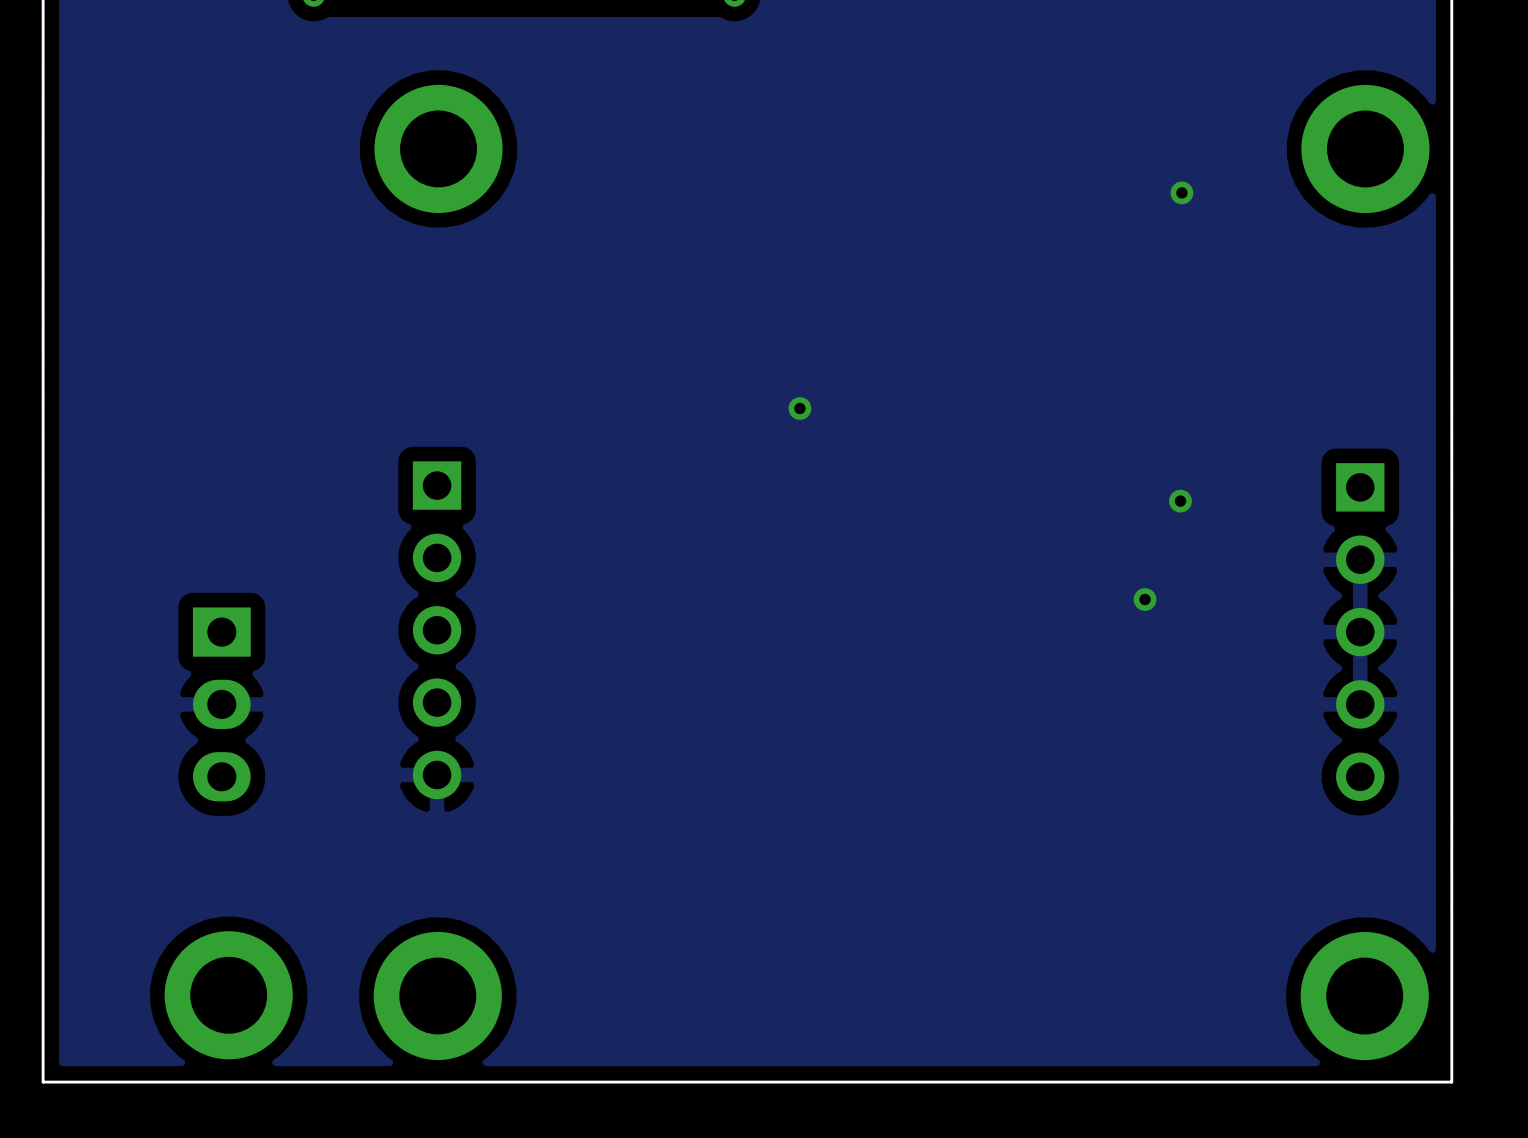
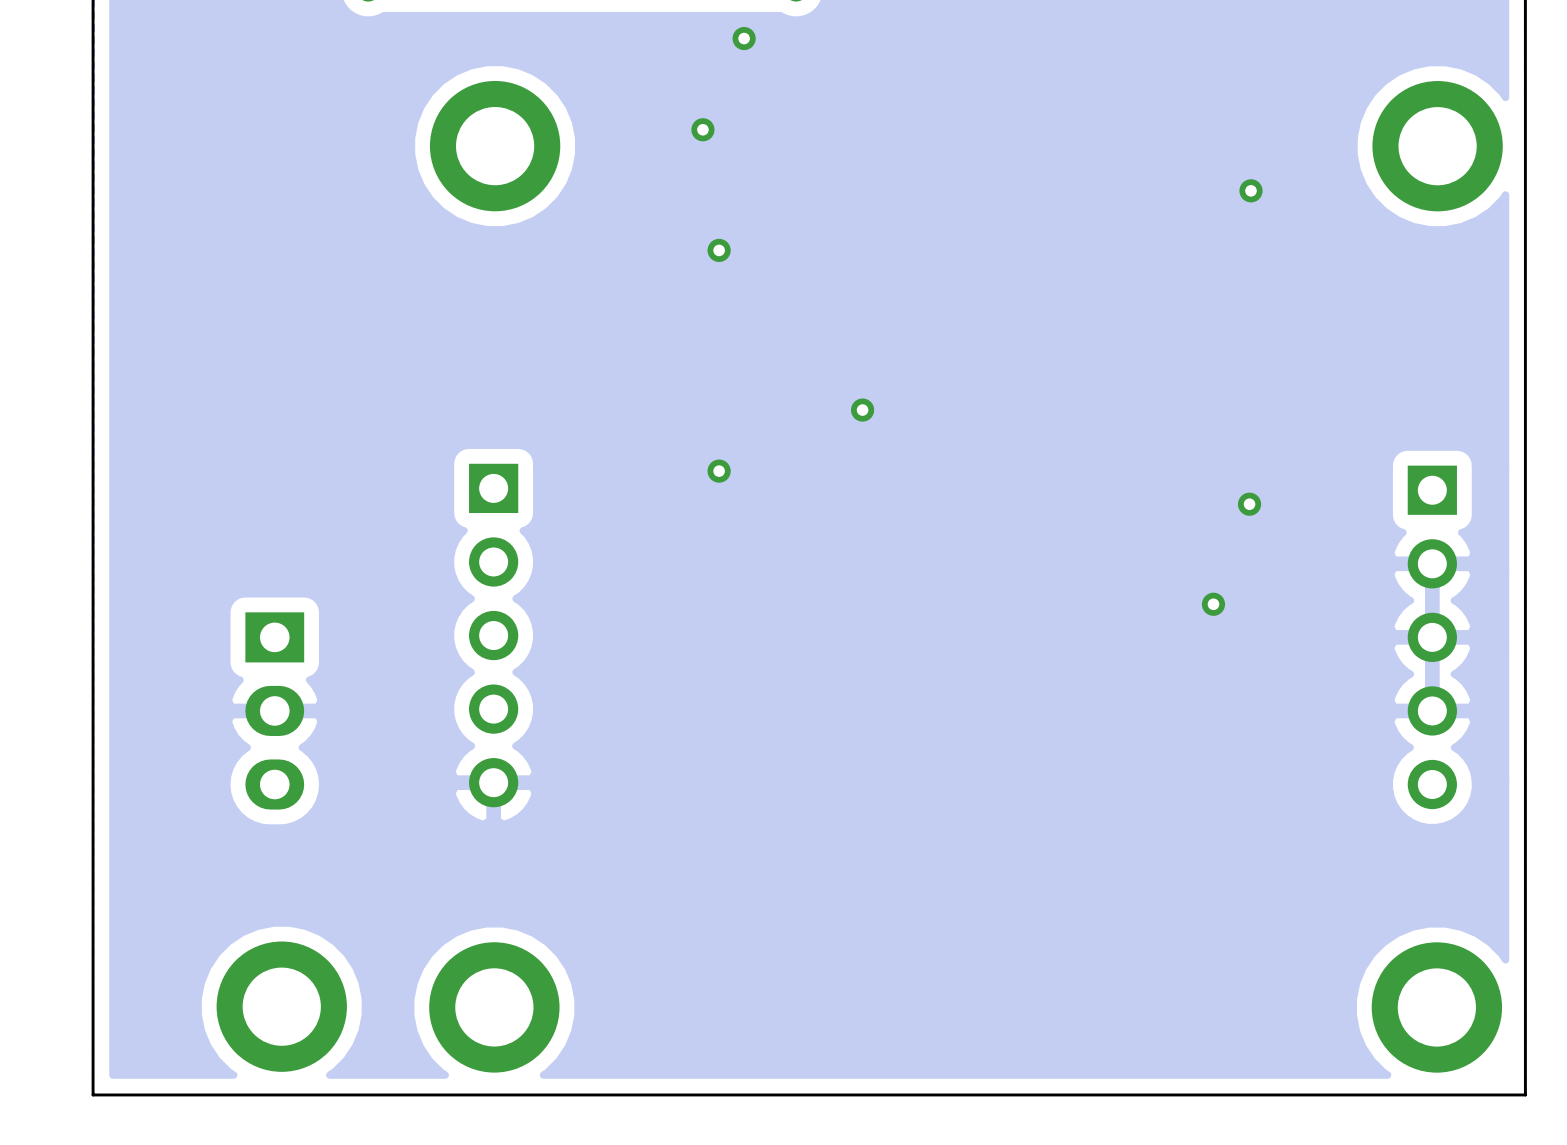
via: none -> (744, 38)
via: none -> (702, 129)
via: none -> (719, 250)
via: none -> (719, 471)

